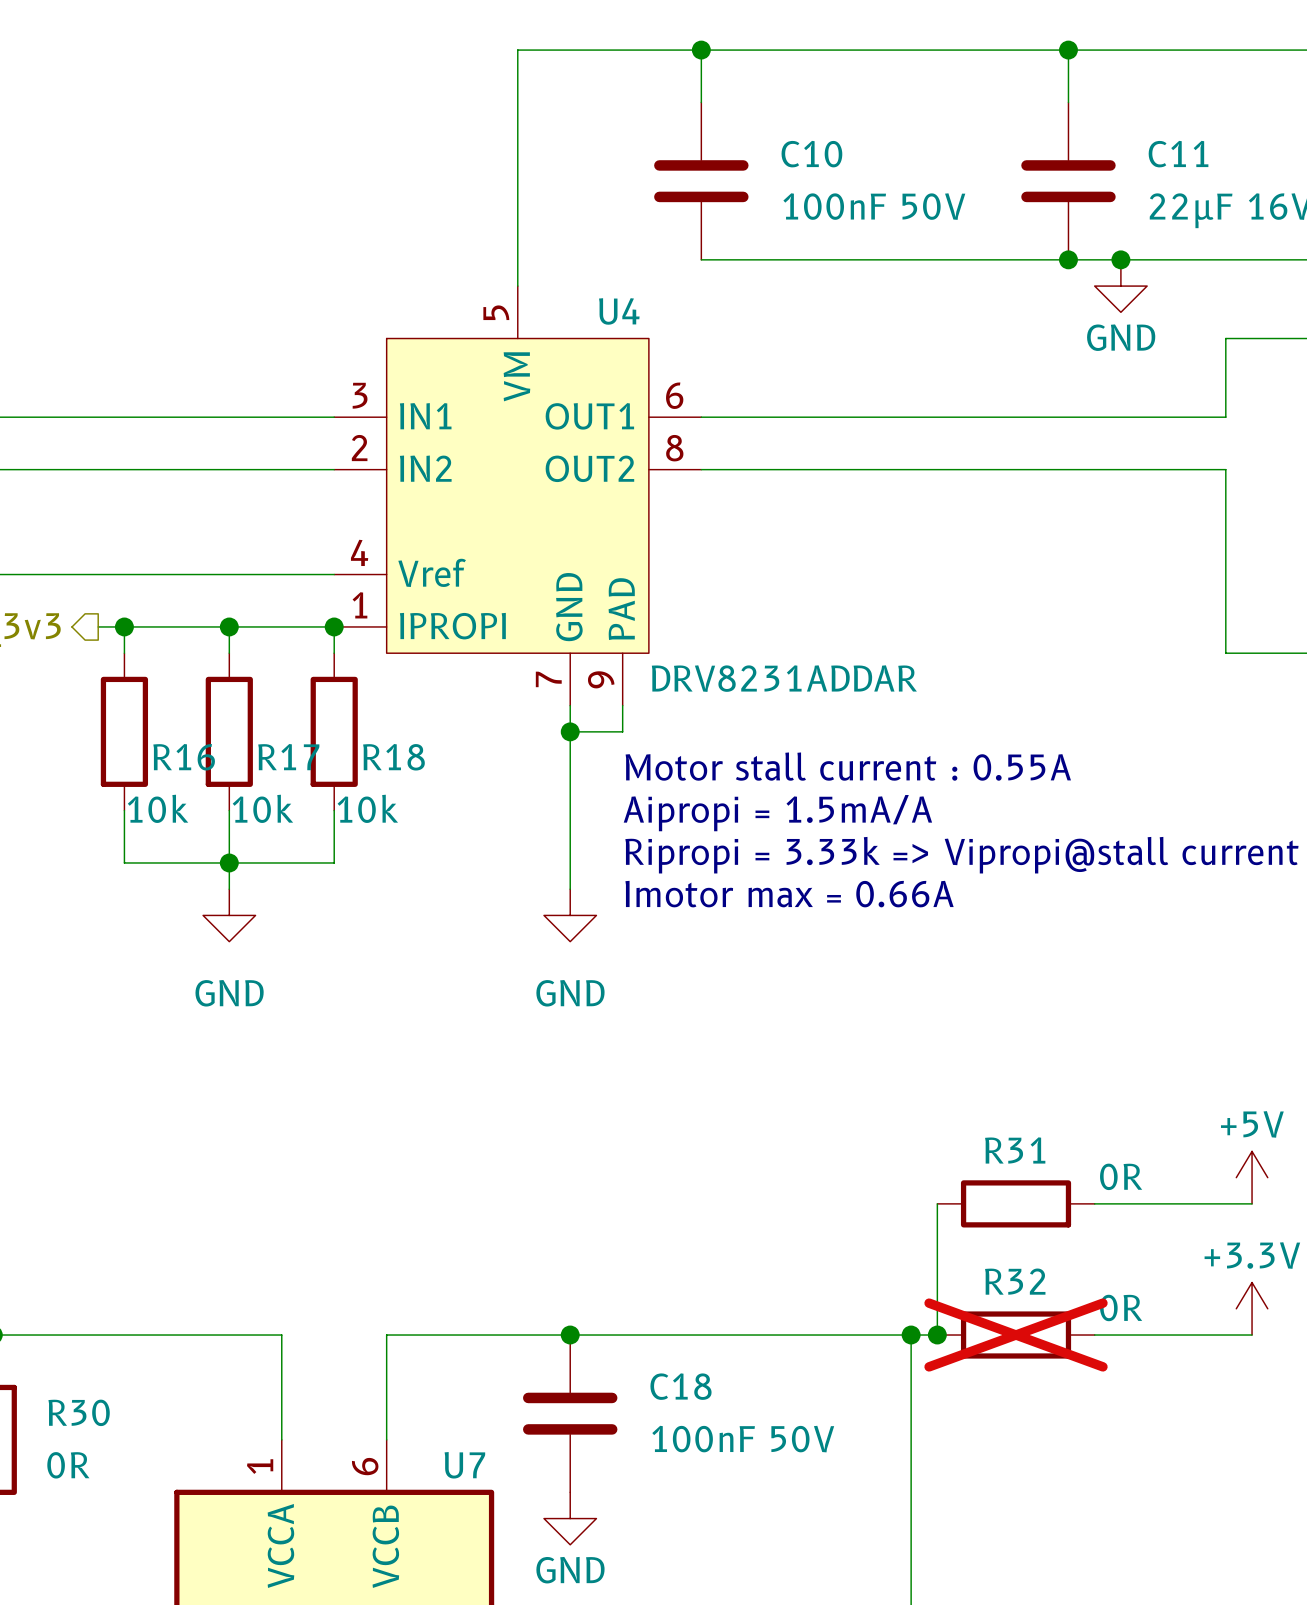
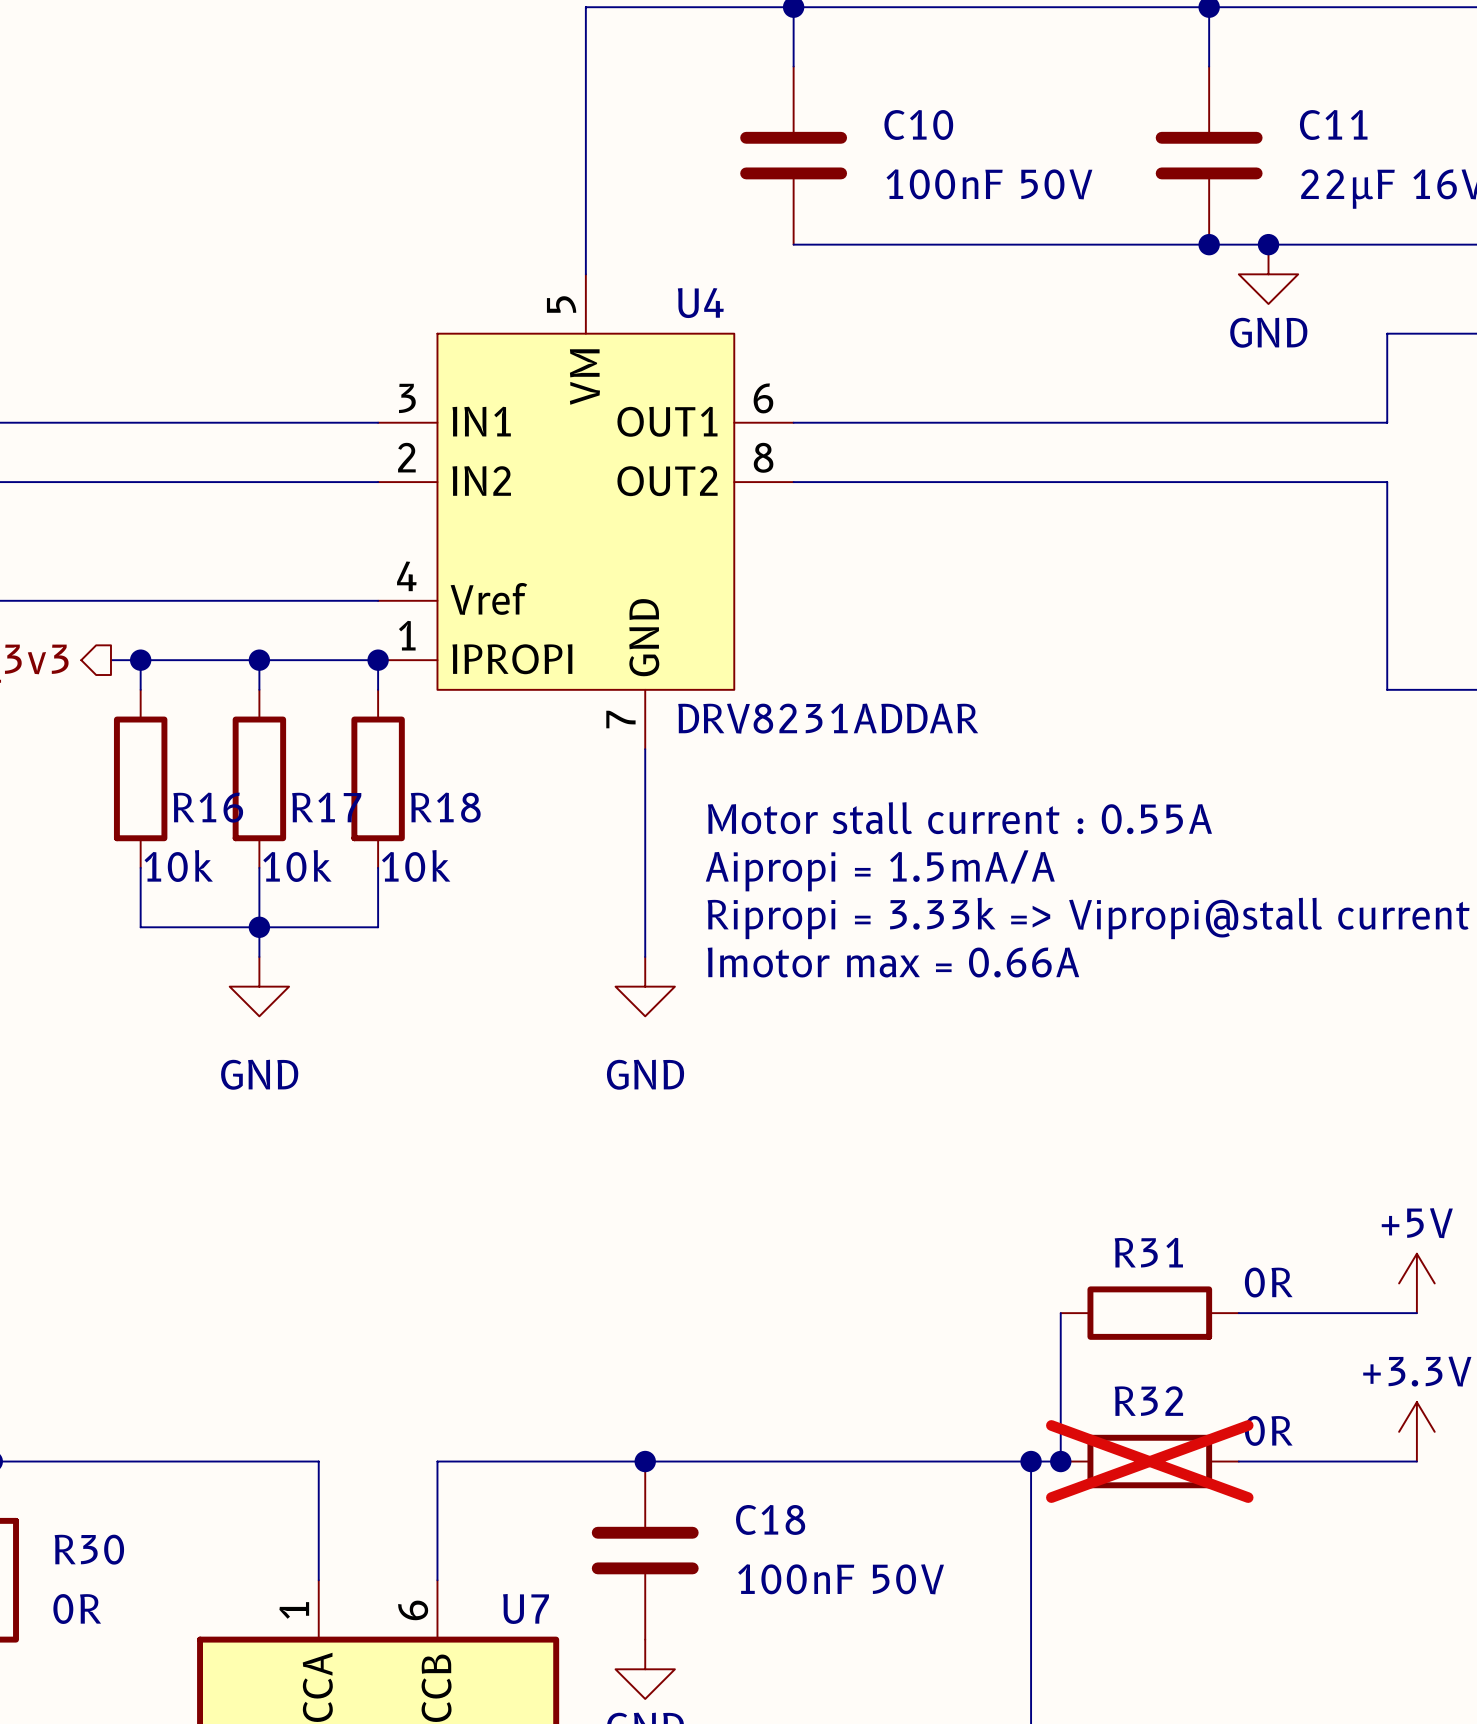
U4 symbol: [334, 286, 702, 706] -> [378, 274, 794, 750]
U4 value position: DRV8231ADDAR (784, 678) -> DRV8231ADDAR (828, 718)
wire: (622, 705) (622, 731) (570, 731) -> none
junction: (570, 731) -> none

